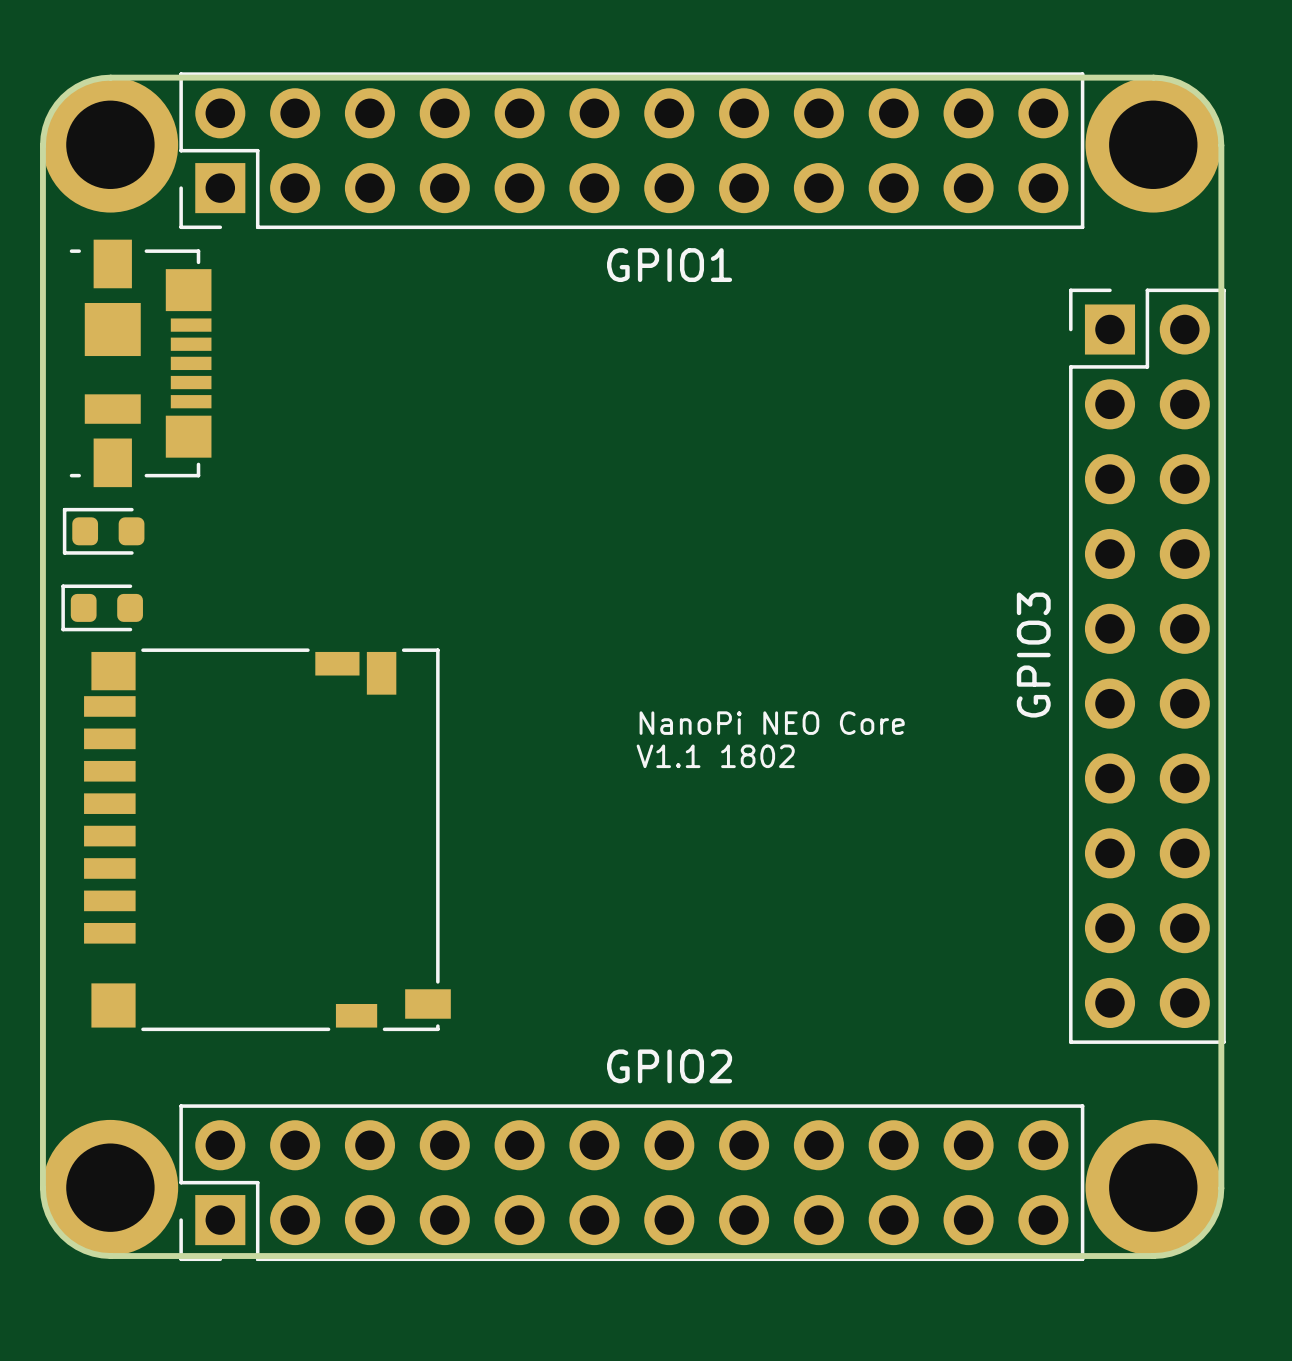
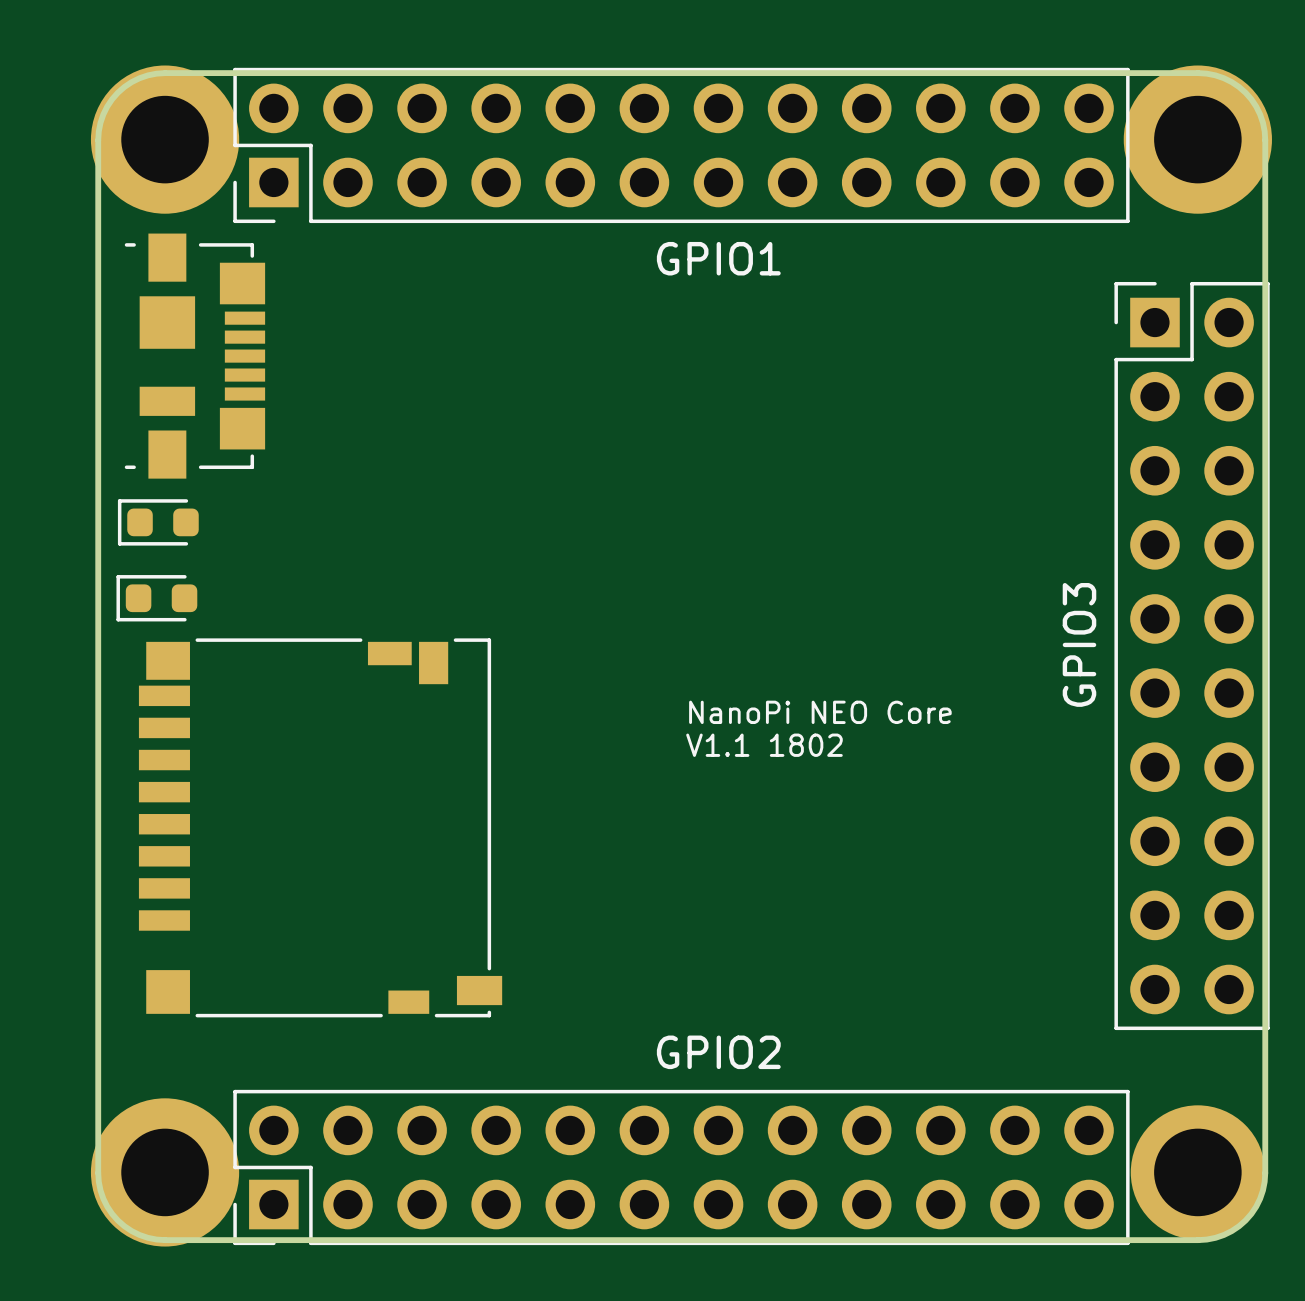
part footprint: [42, 77, 179, 213] -> [90, 65, 240, 214]
part footprint: [1085, 77, 1222, 213] -> [1123, 65, 1272, 214]
part footprint: [42, 1119, 179, 1256] -> [90, 1098, 240, 1247]

